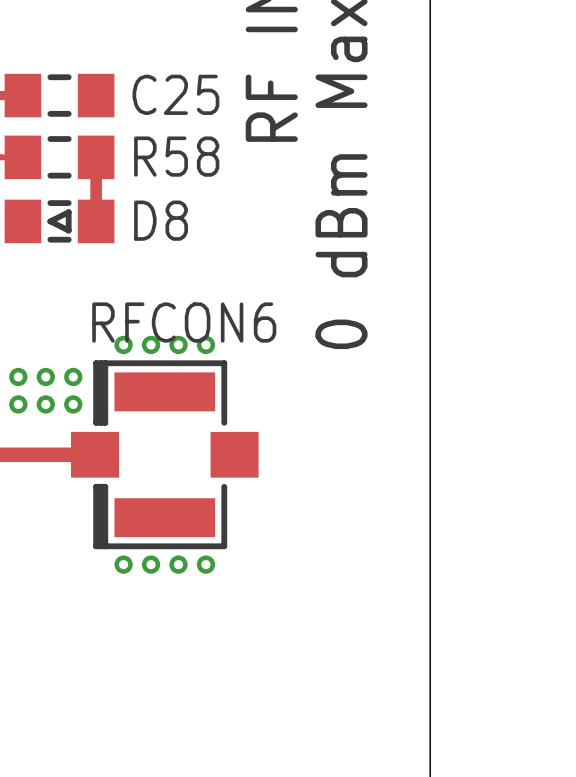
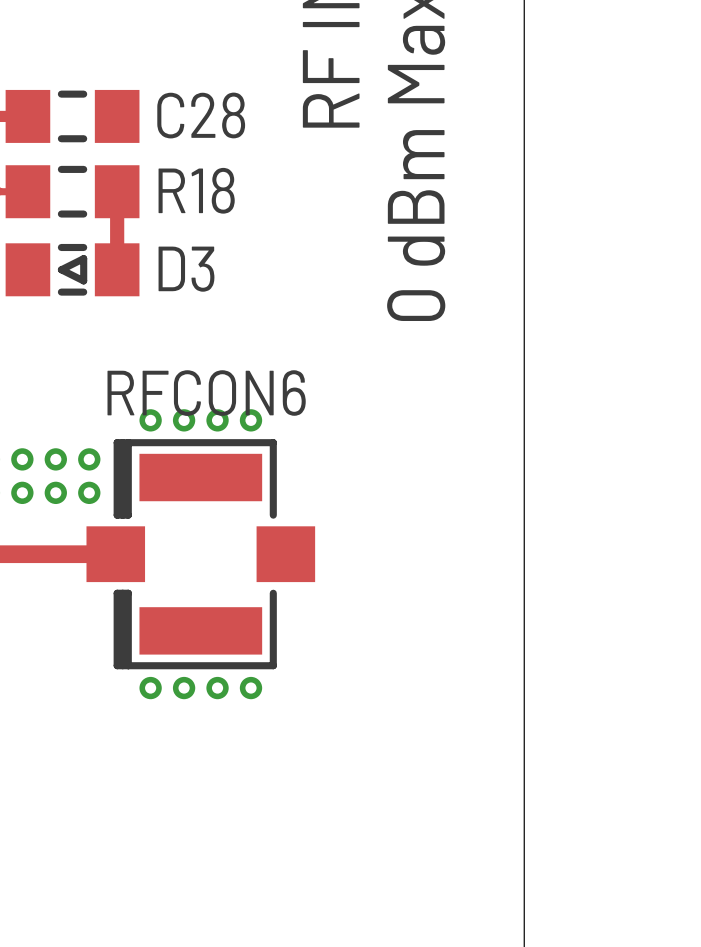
C25 name: C25 (175, 94) -> C28 (201, 115)
R58 name: R58 (176, 156) -> R18 (196, 190)
D8 name: D8 (161, 220) -> D3 (186, 269)

